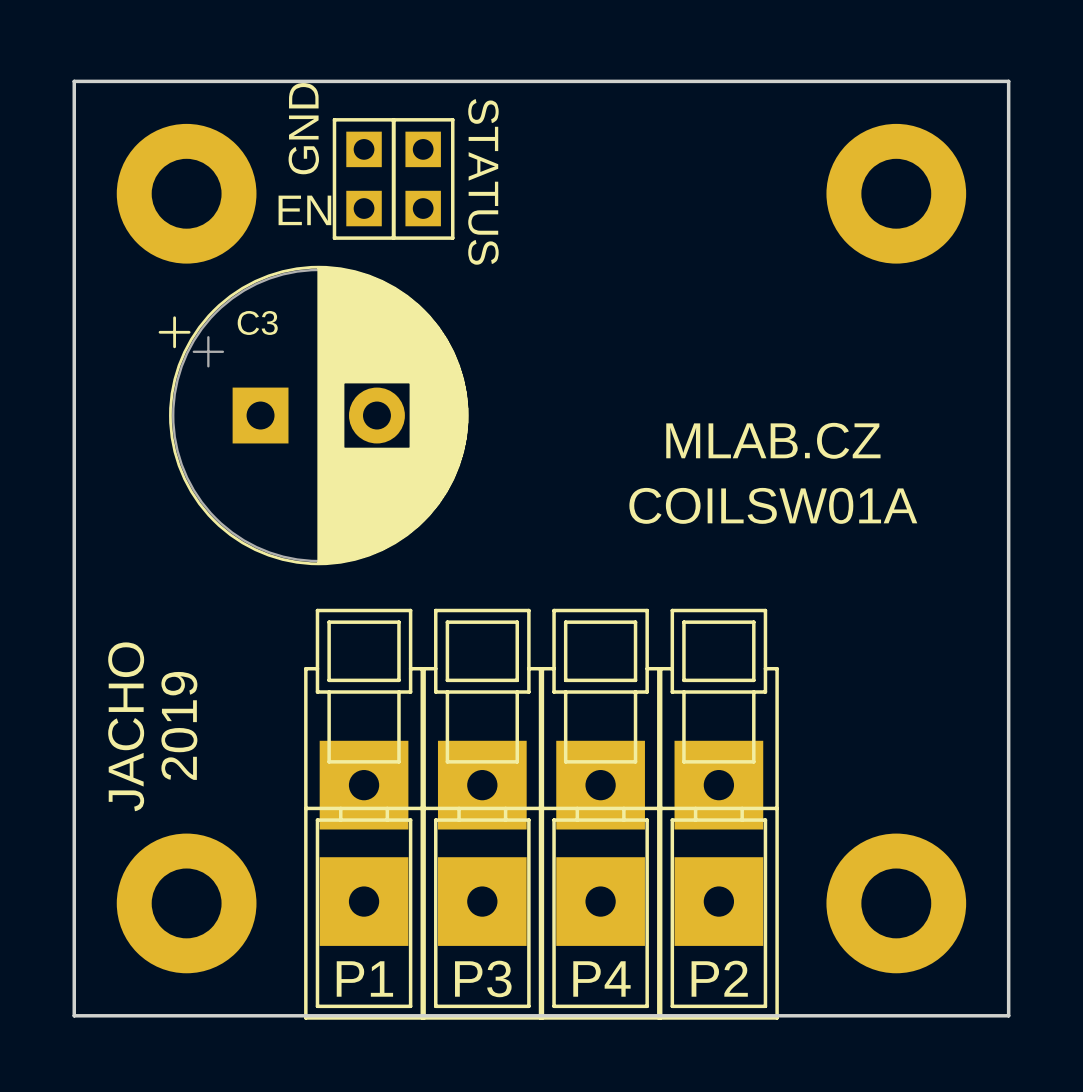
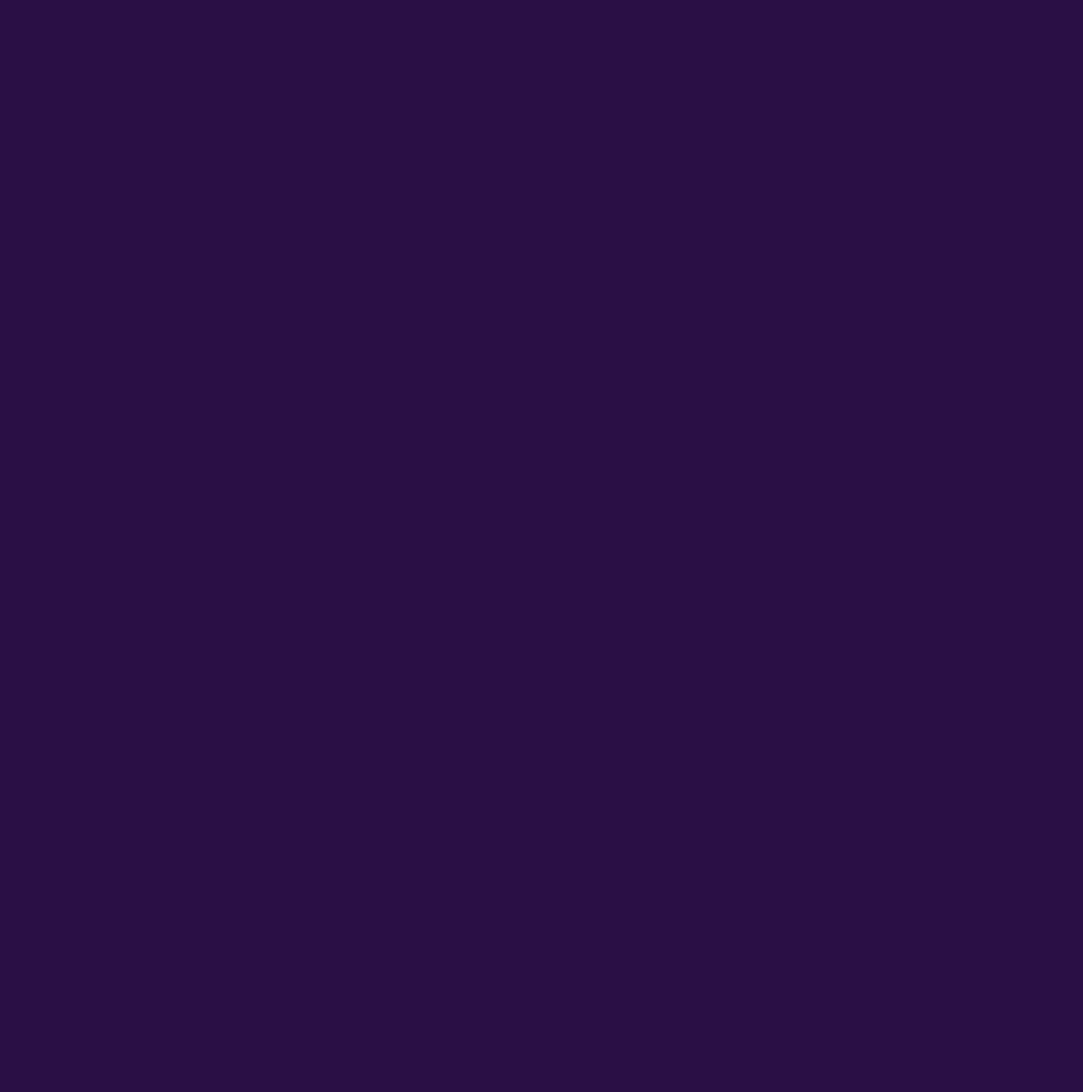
board edge: (74, 81) (74, 1015) (1008, 1015) (1008, 81) (74, 81) -> none
text: GND (303, 128) -> none
part: (364, 178) -> none
part: (423, 178) -> none
text: STATUS (483, 181) -> none
part: (186, 193) -> none
part: (896, 193) -> none
text: EN (304, 210) -> none
C3: (313, 415) -> none
text: MLAB.CZ (773, 440) -> none
text: COILSW01A (773, 505) -> none
text: 2019 (179, 725) -> none
text: JACHO (126, 726) -> none
P1: (364, 814) -> none
P3: (482, 814) -> none
P4: (600, 814) -> none
P2: (718, 814) -> none
part: (186, 903) -> none
part: (896, 903) -> none

